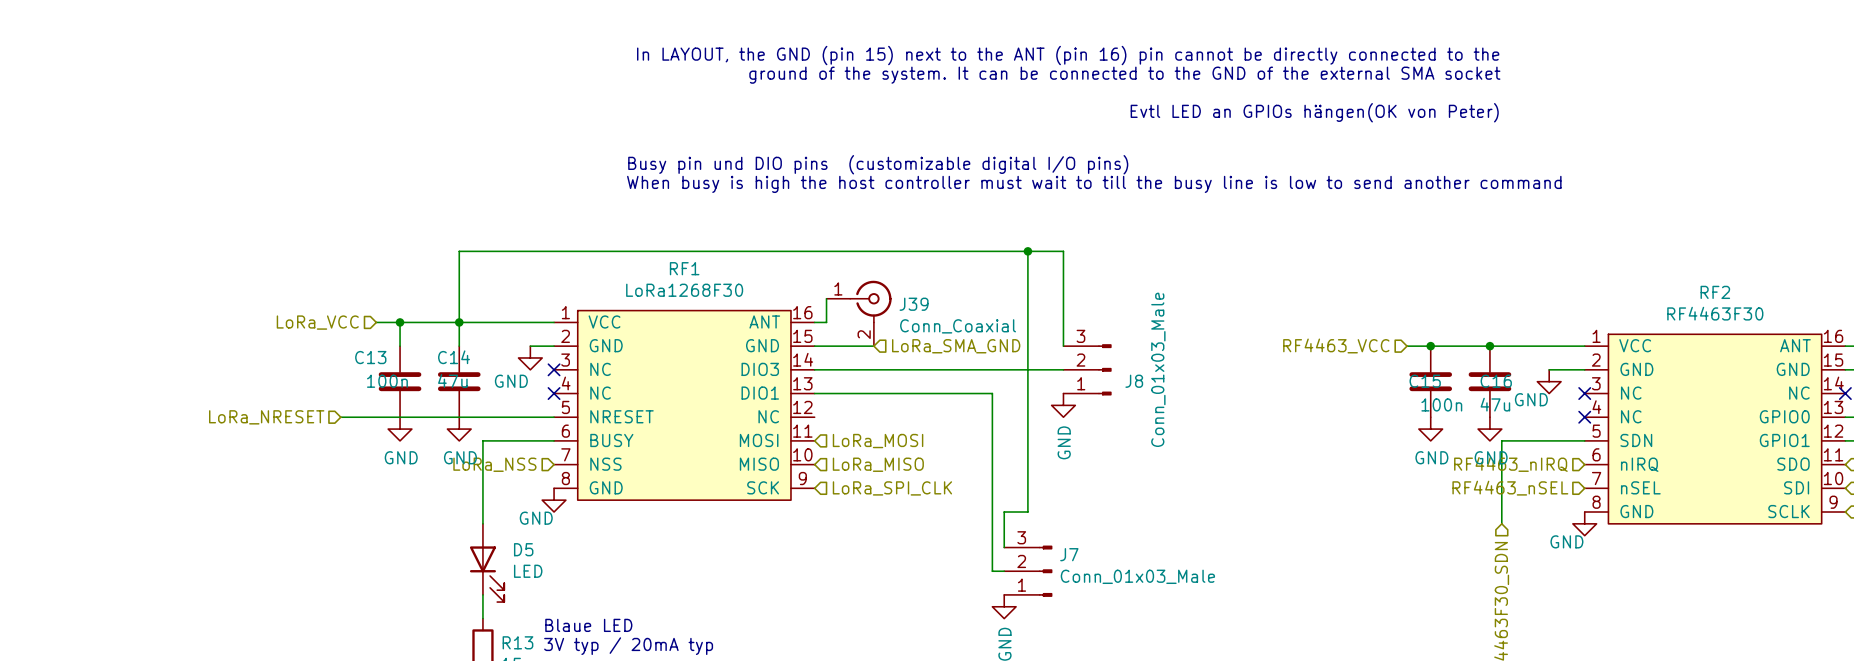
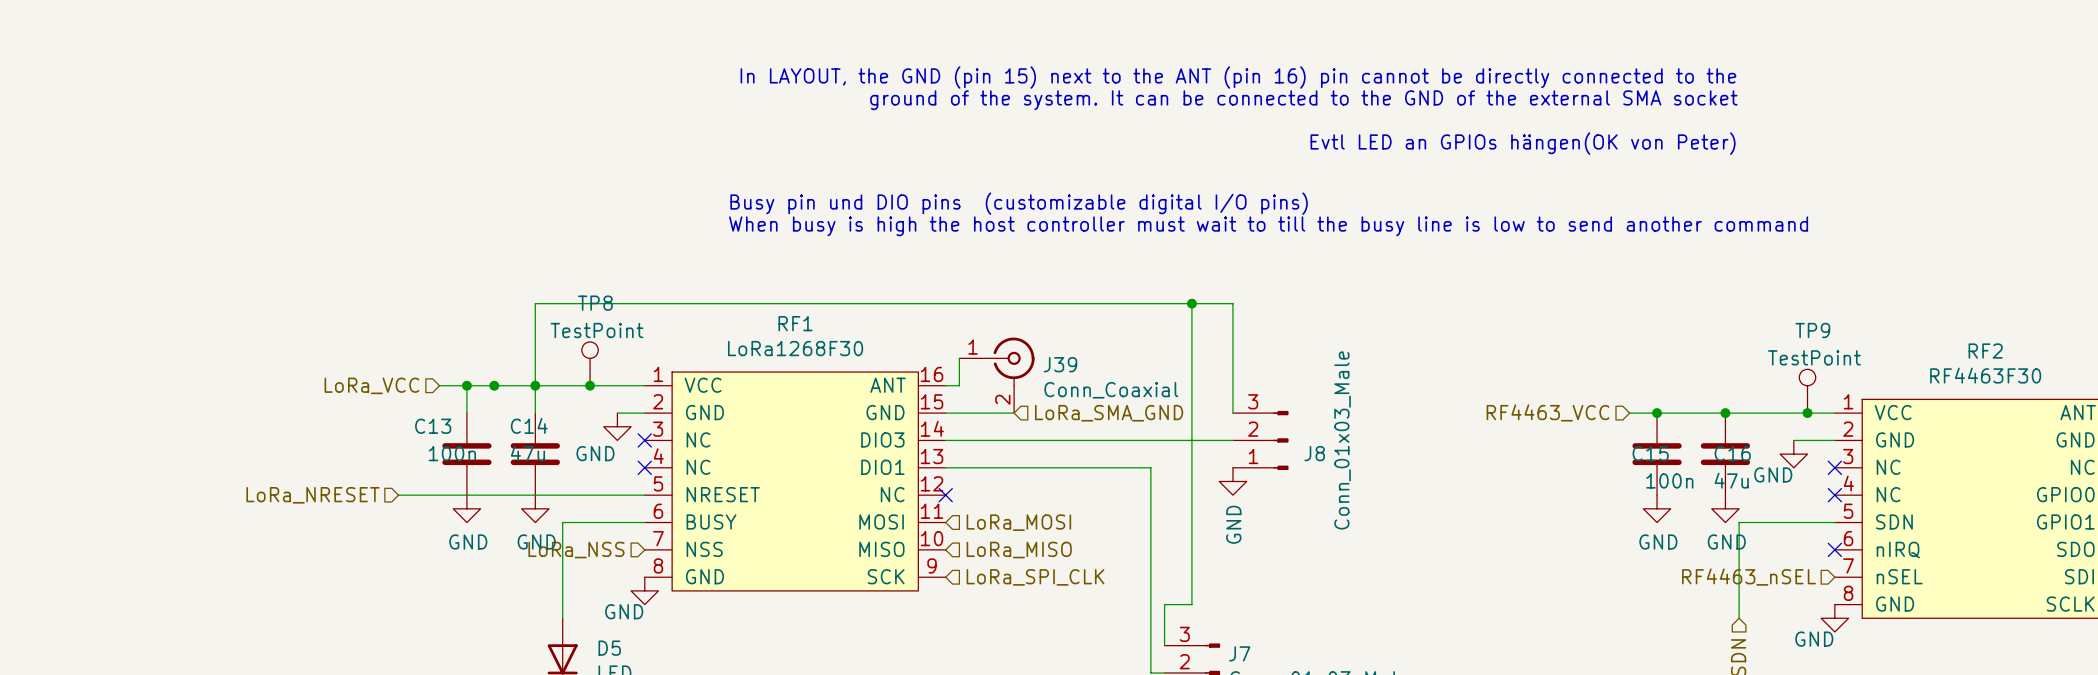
TP8: none -> TestPoint (590, 363)
junction: none -> (494, 385)
junction: none -> (590, 385)
TP9: none -> TestPoint (1807, 391)
junction: none -> (1807, 413)
no-connect mark: none -> (945, 495)
hierarchical label: RF4463_nIRQ (1510, 464) -> none
no-connect mark: none -> (1834, 549)

